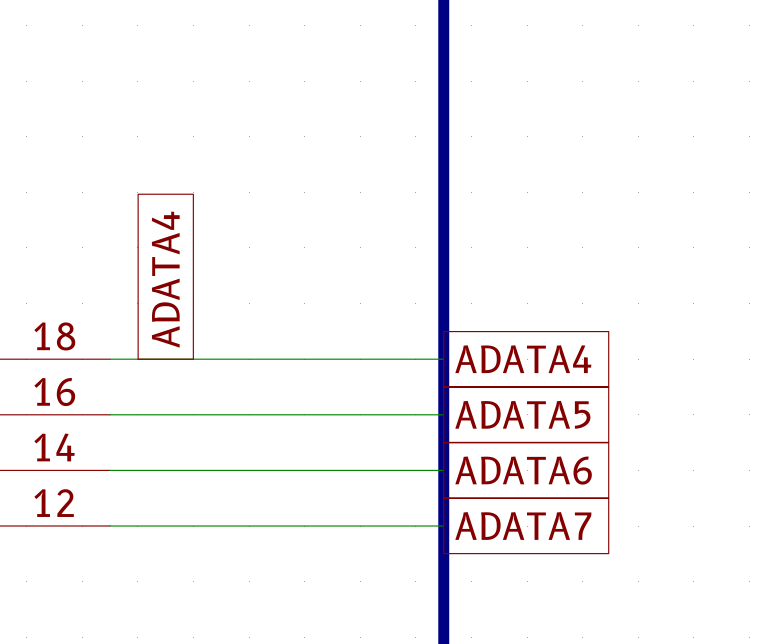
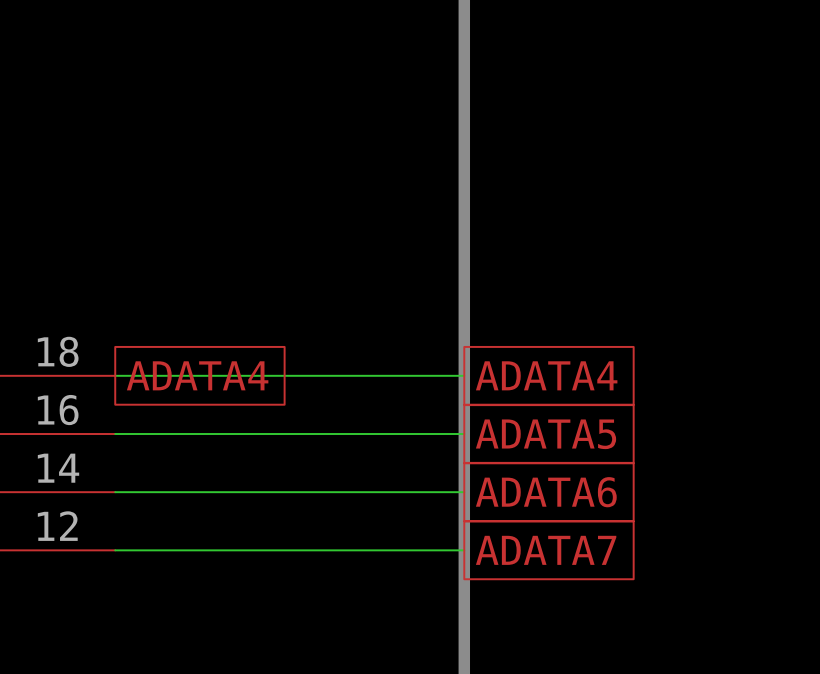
global label rotation: 0° (165, 279) -> 90° clockwise (197, 375)

